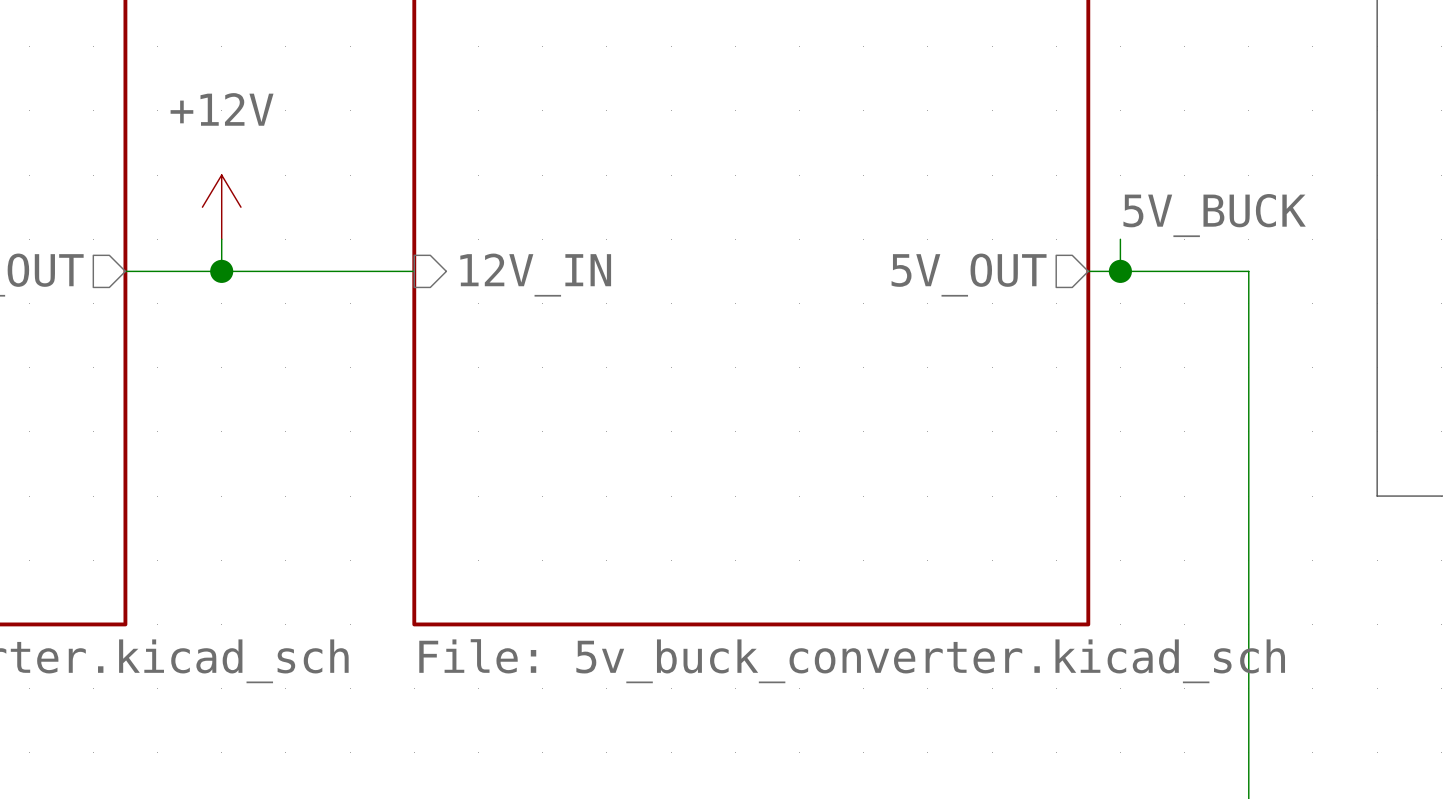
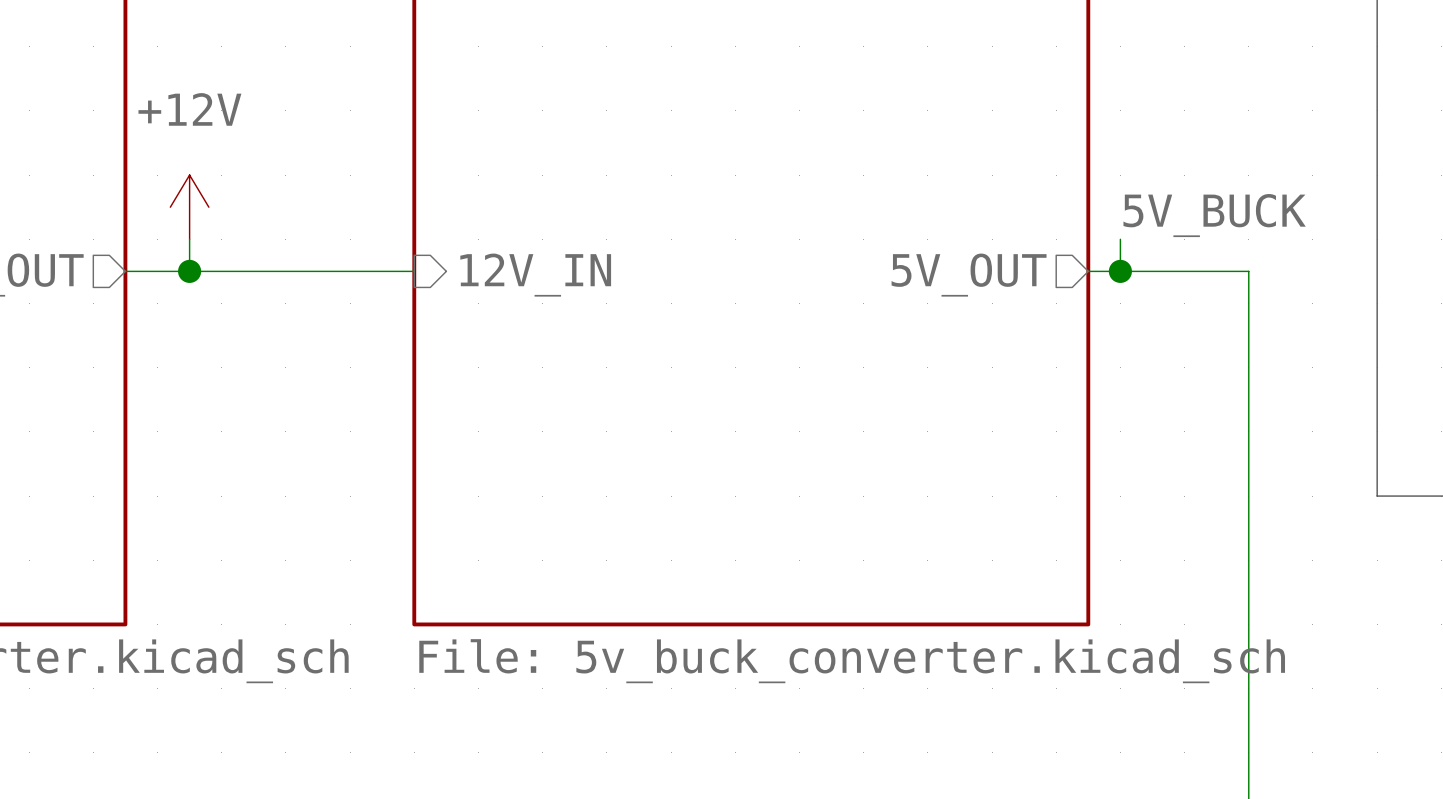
power symbol position: +12V (221, 207) -> +12V (189, 207)
wire: (221, 239) (221, 271) -> (189, 239) (189, 271)
junction position: (221, 271) -> (189, 271)

